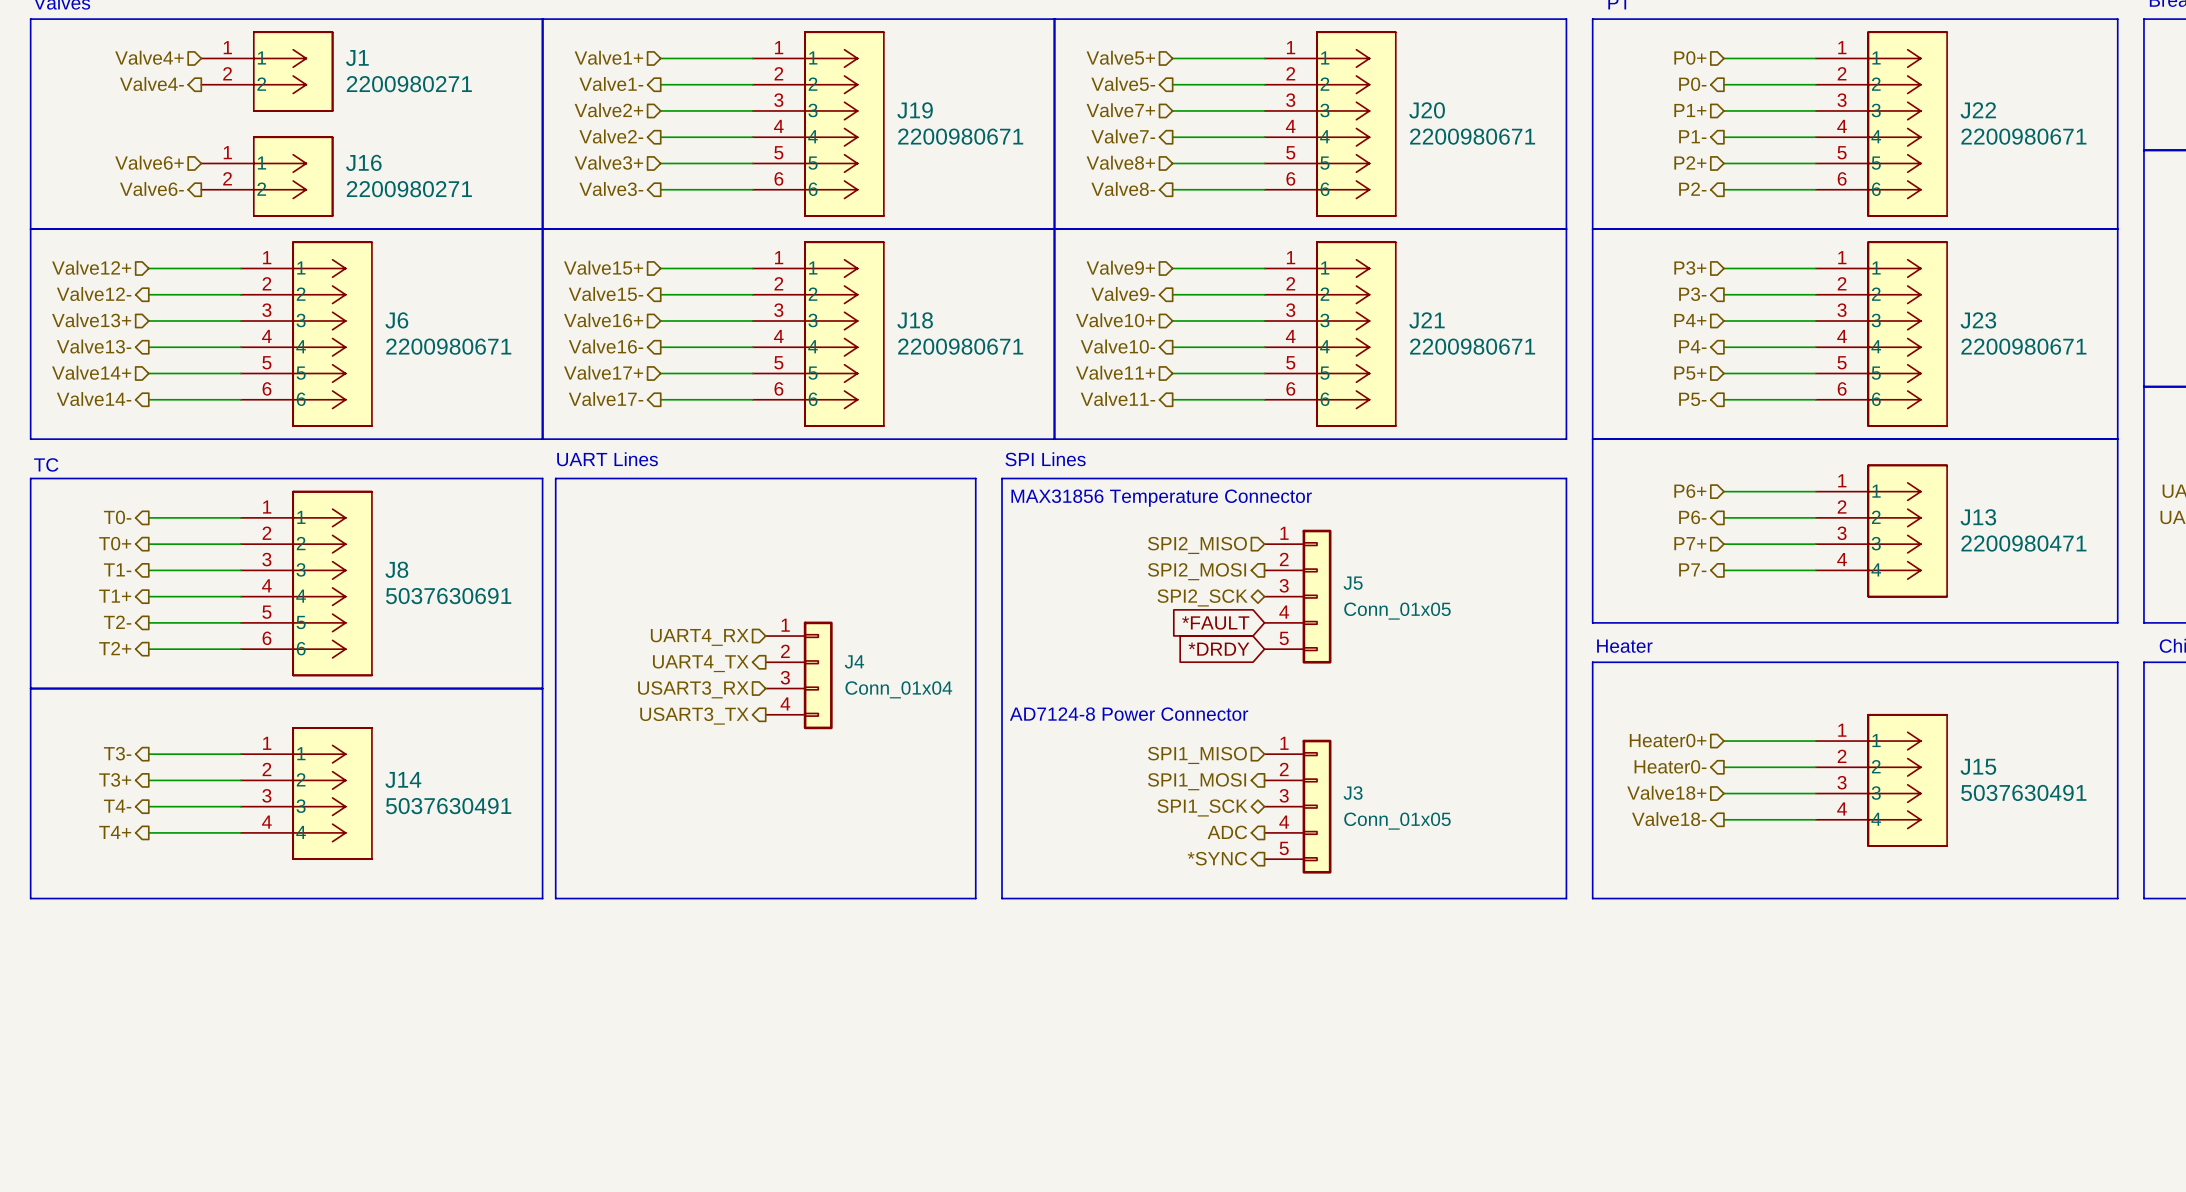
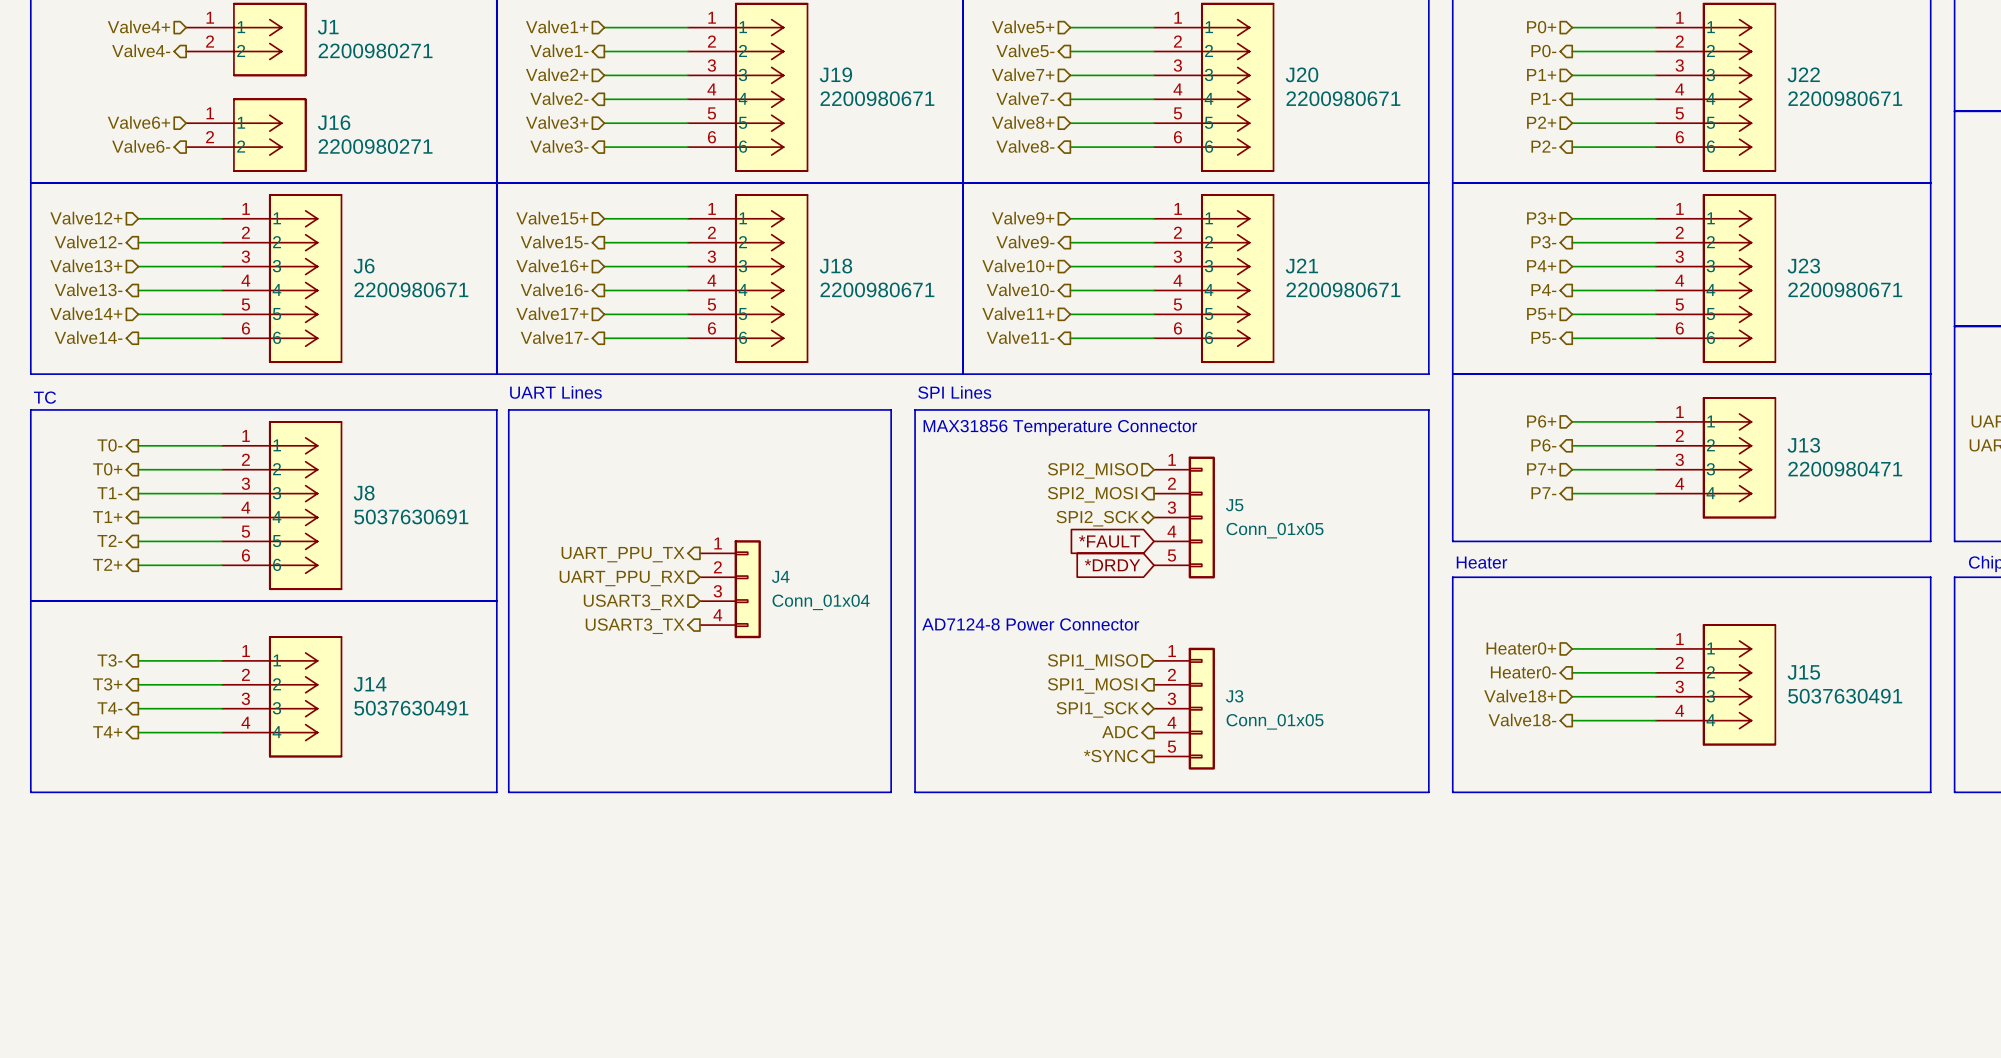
hierarchical label shape: input (699, 637) -> output (623, 554)
hierarchical label: UART4_RX (699, 637) -> UART_PPU_TX (623, 554)
hierarchical label shape: output (700, 663) -> input (622, 578)
hierarchical label: UART4_TX (700, 663) -> UART_PPU_RX (622, 578)

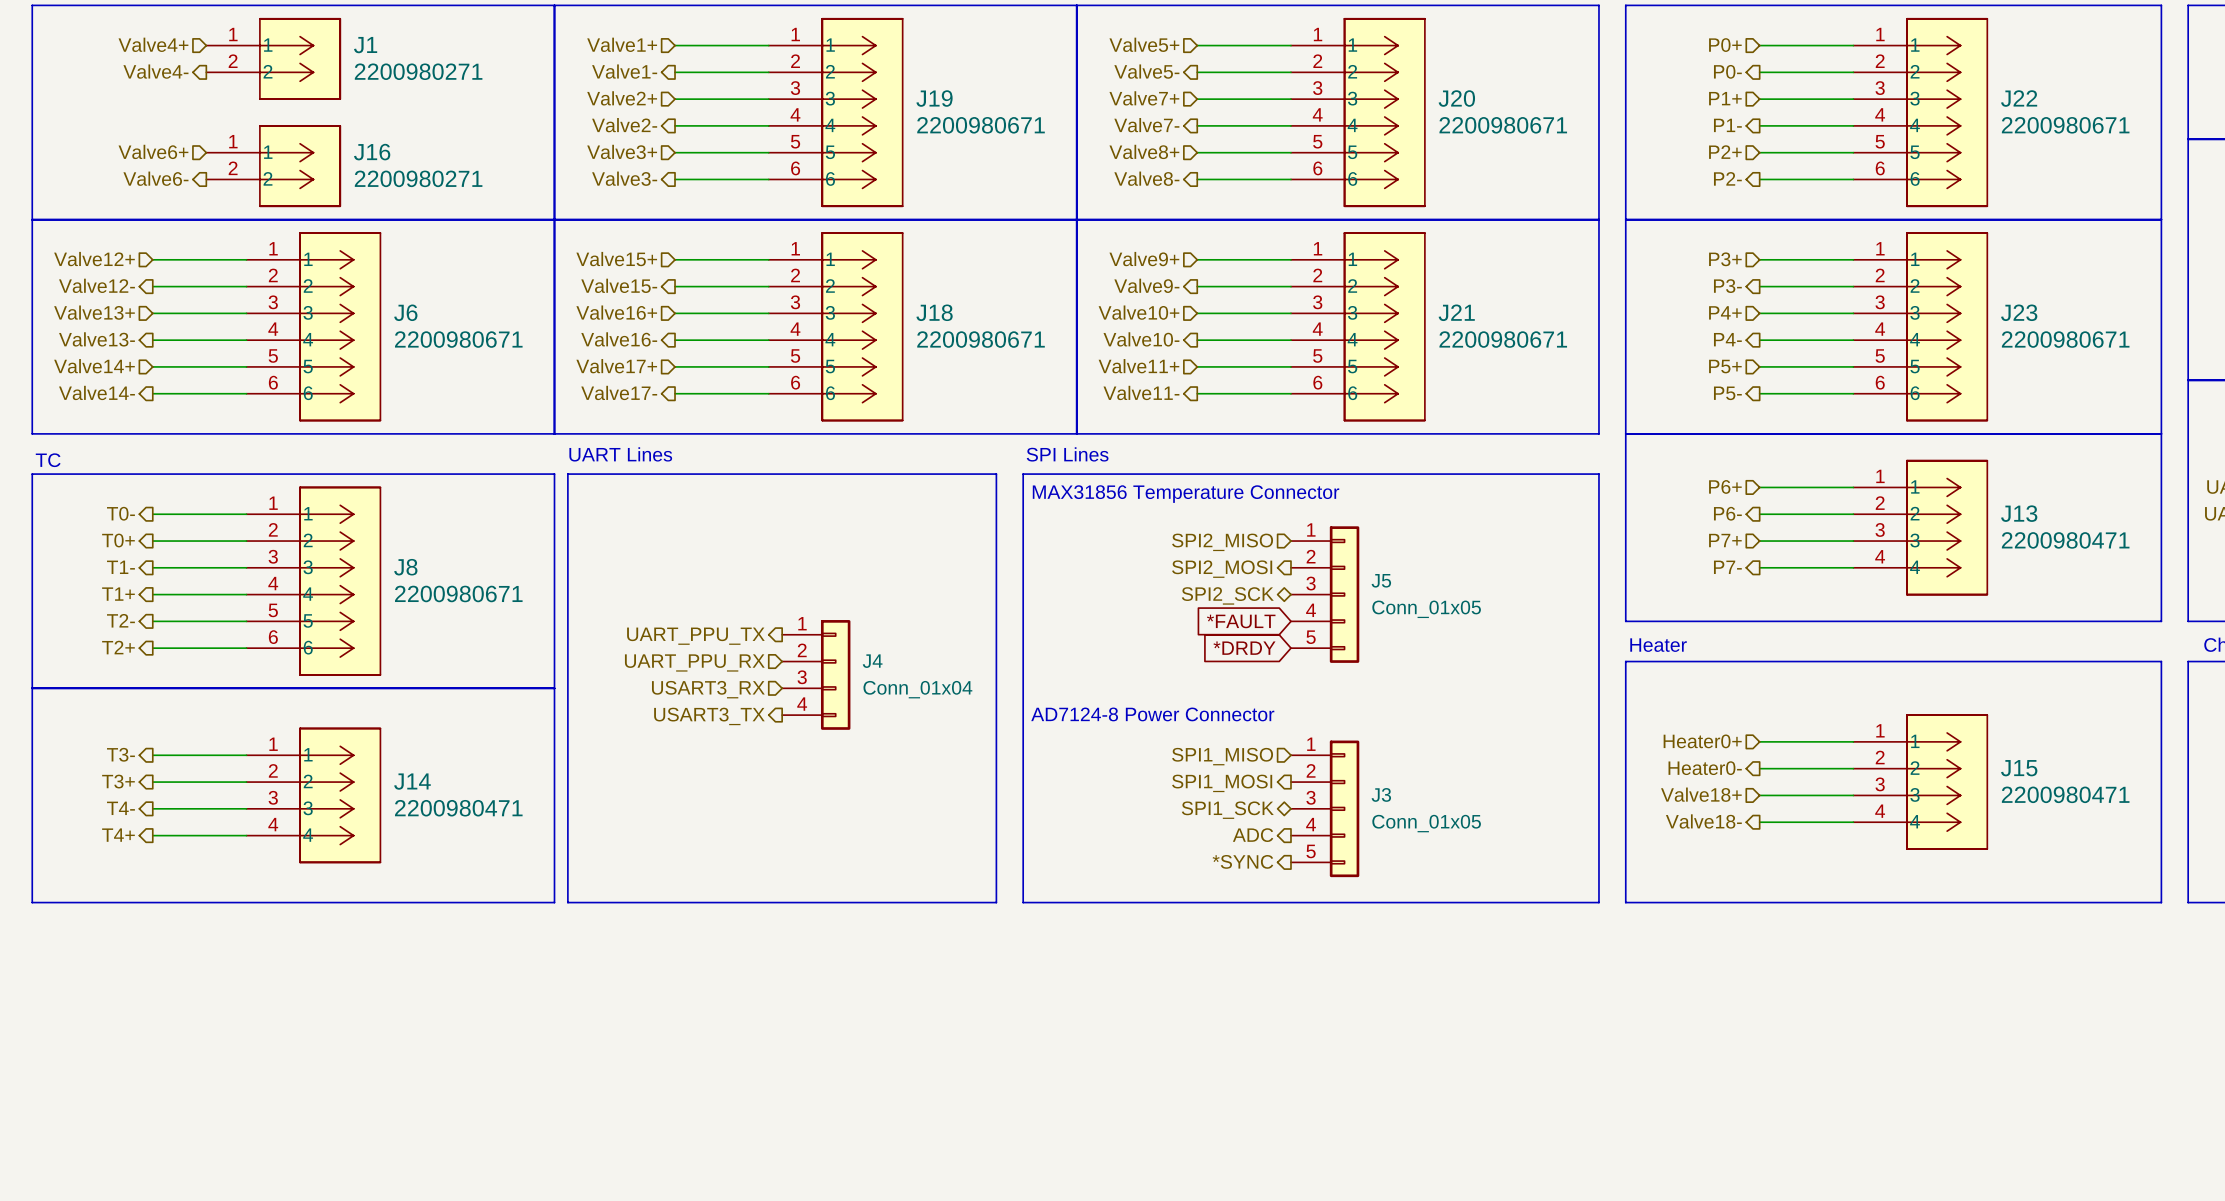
J8 value: 5037630691 (411, 516) -> 2200980671 (458, 593)
J15 value: 5037630491 (1845, 696) -> 2200980471 (2065, 794)
J14 value: 5037630491 (411, 708) -> 2200980471 (458, 808)

